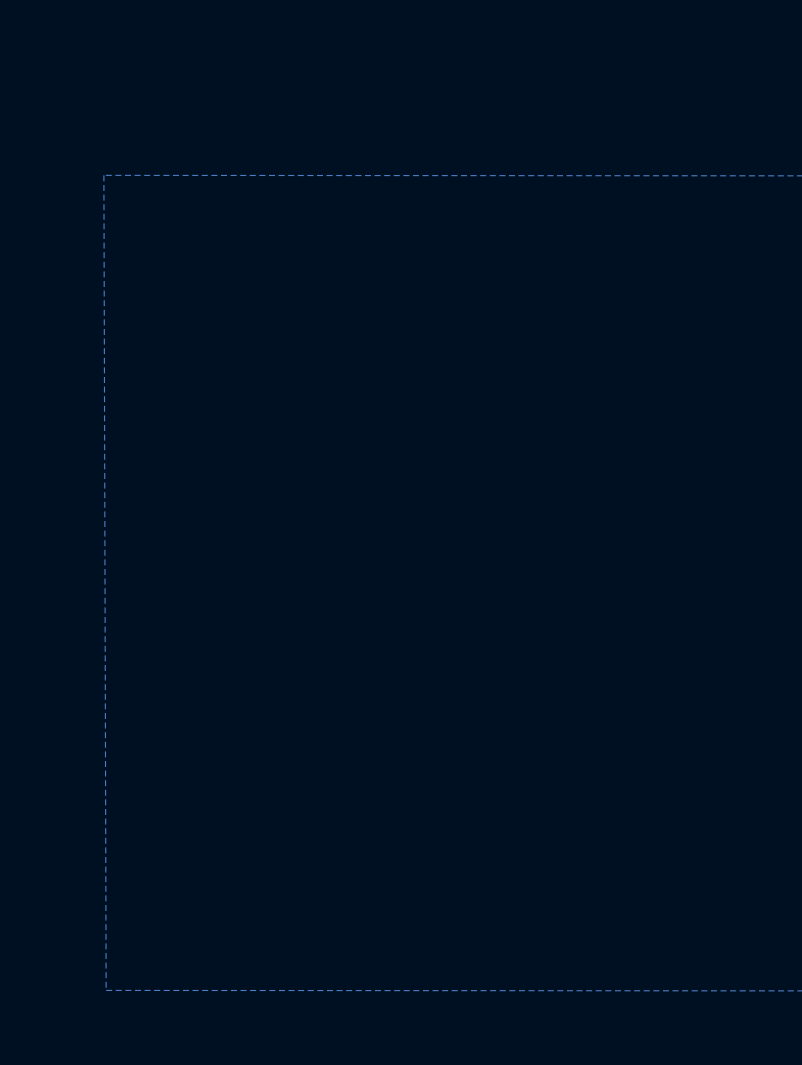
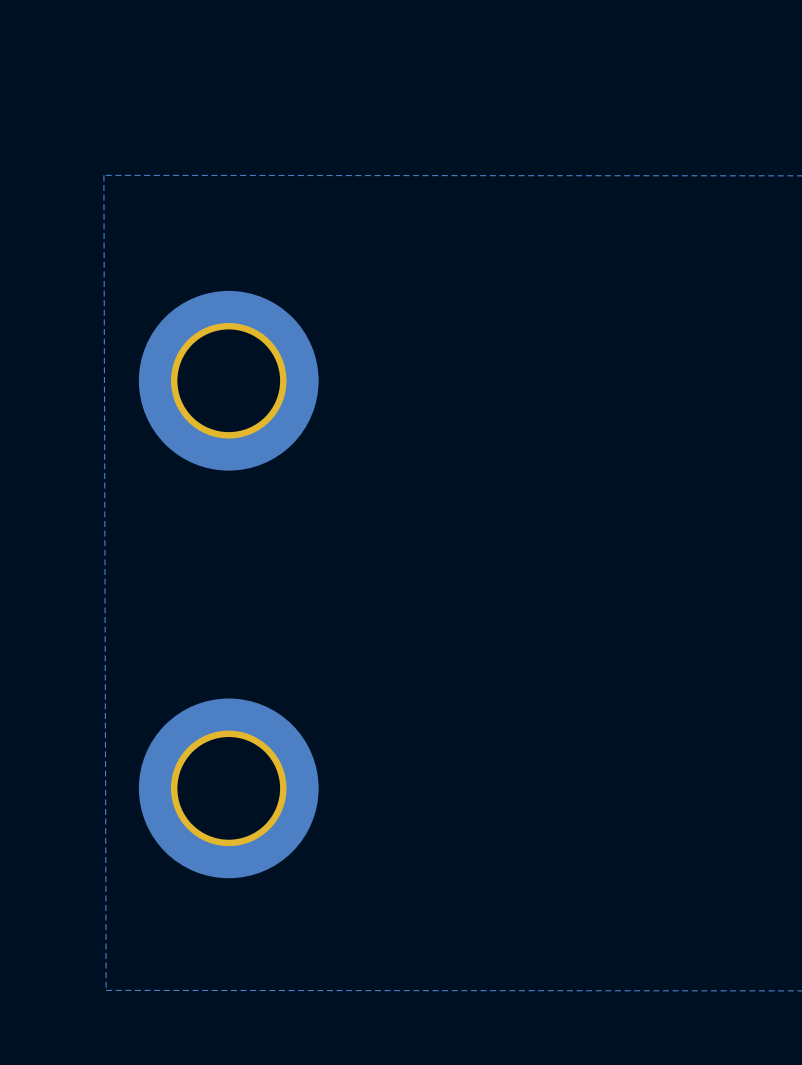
part: none -> (228, 380)
part: none -> (228, 788)

